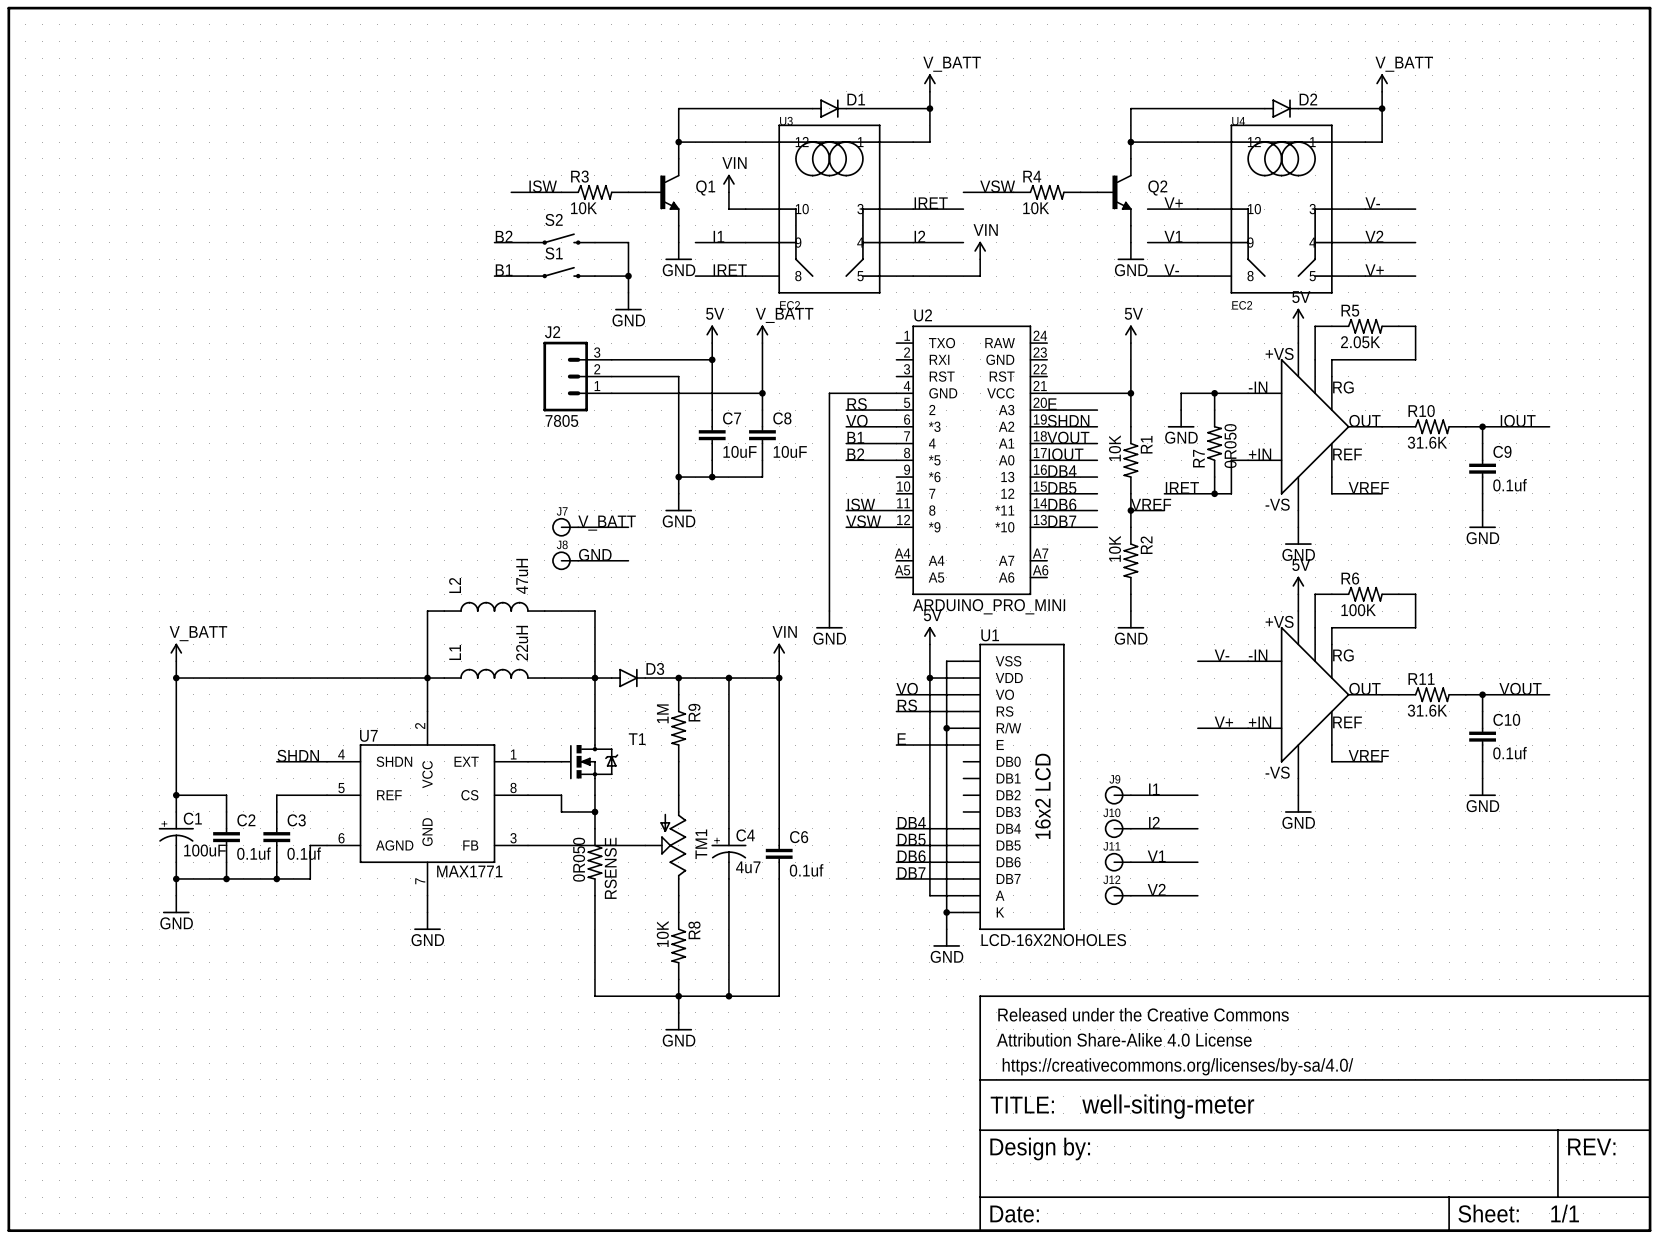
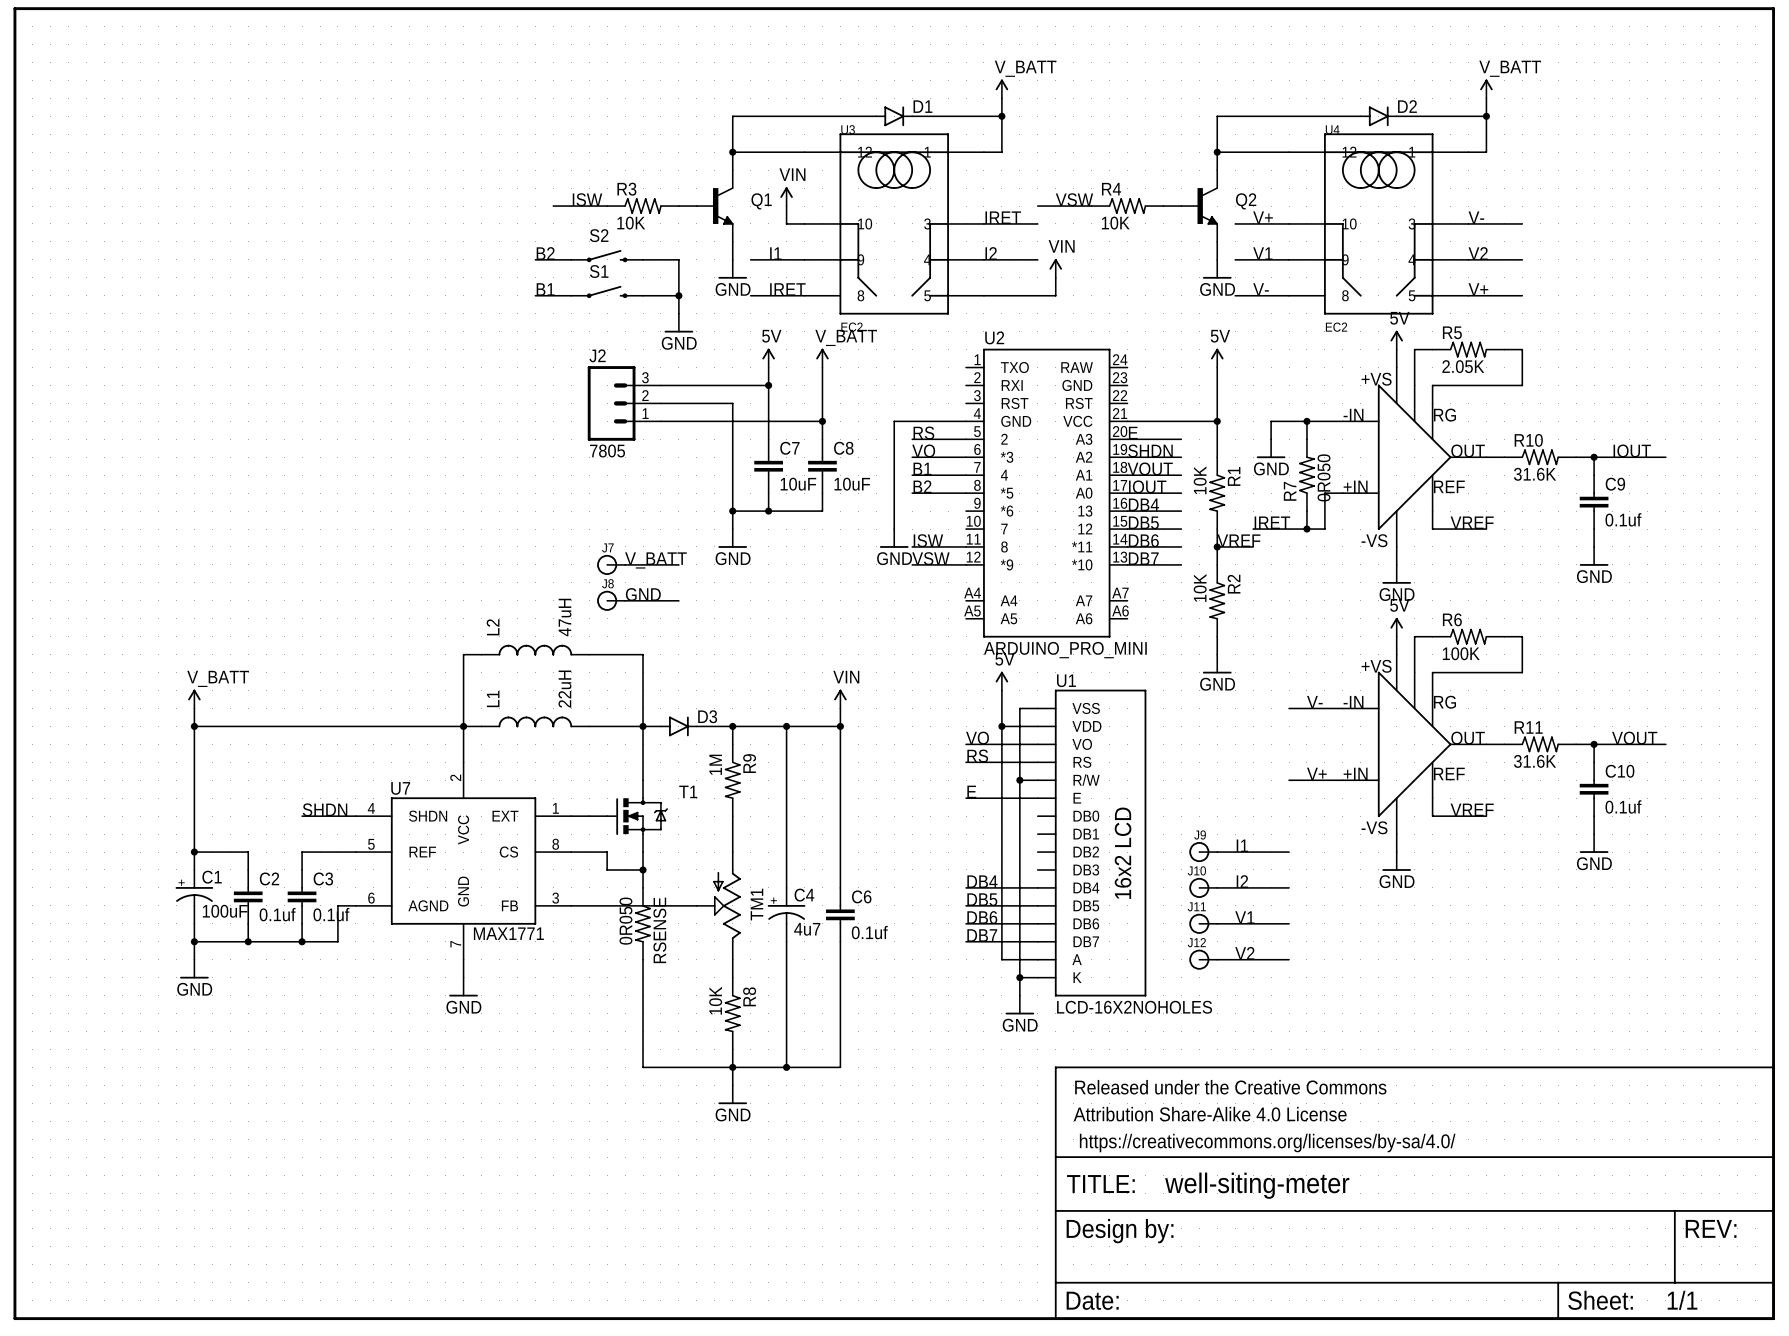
wire: (829, 493) (829, 611) -> none
power symbol position: GND (829, 619) -> GND (894, 538)

